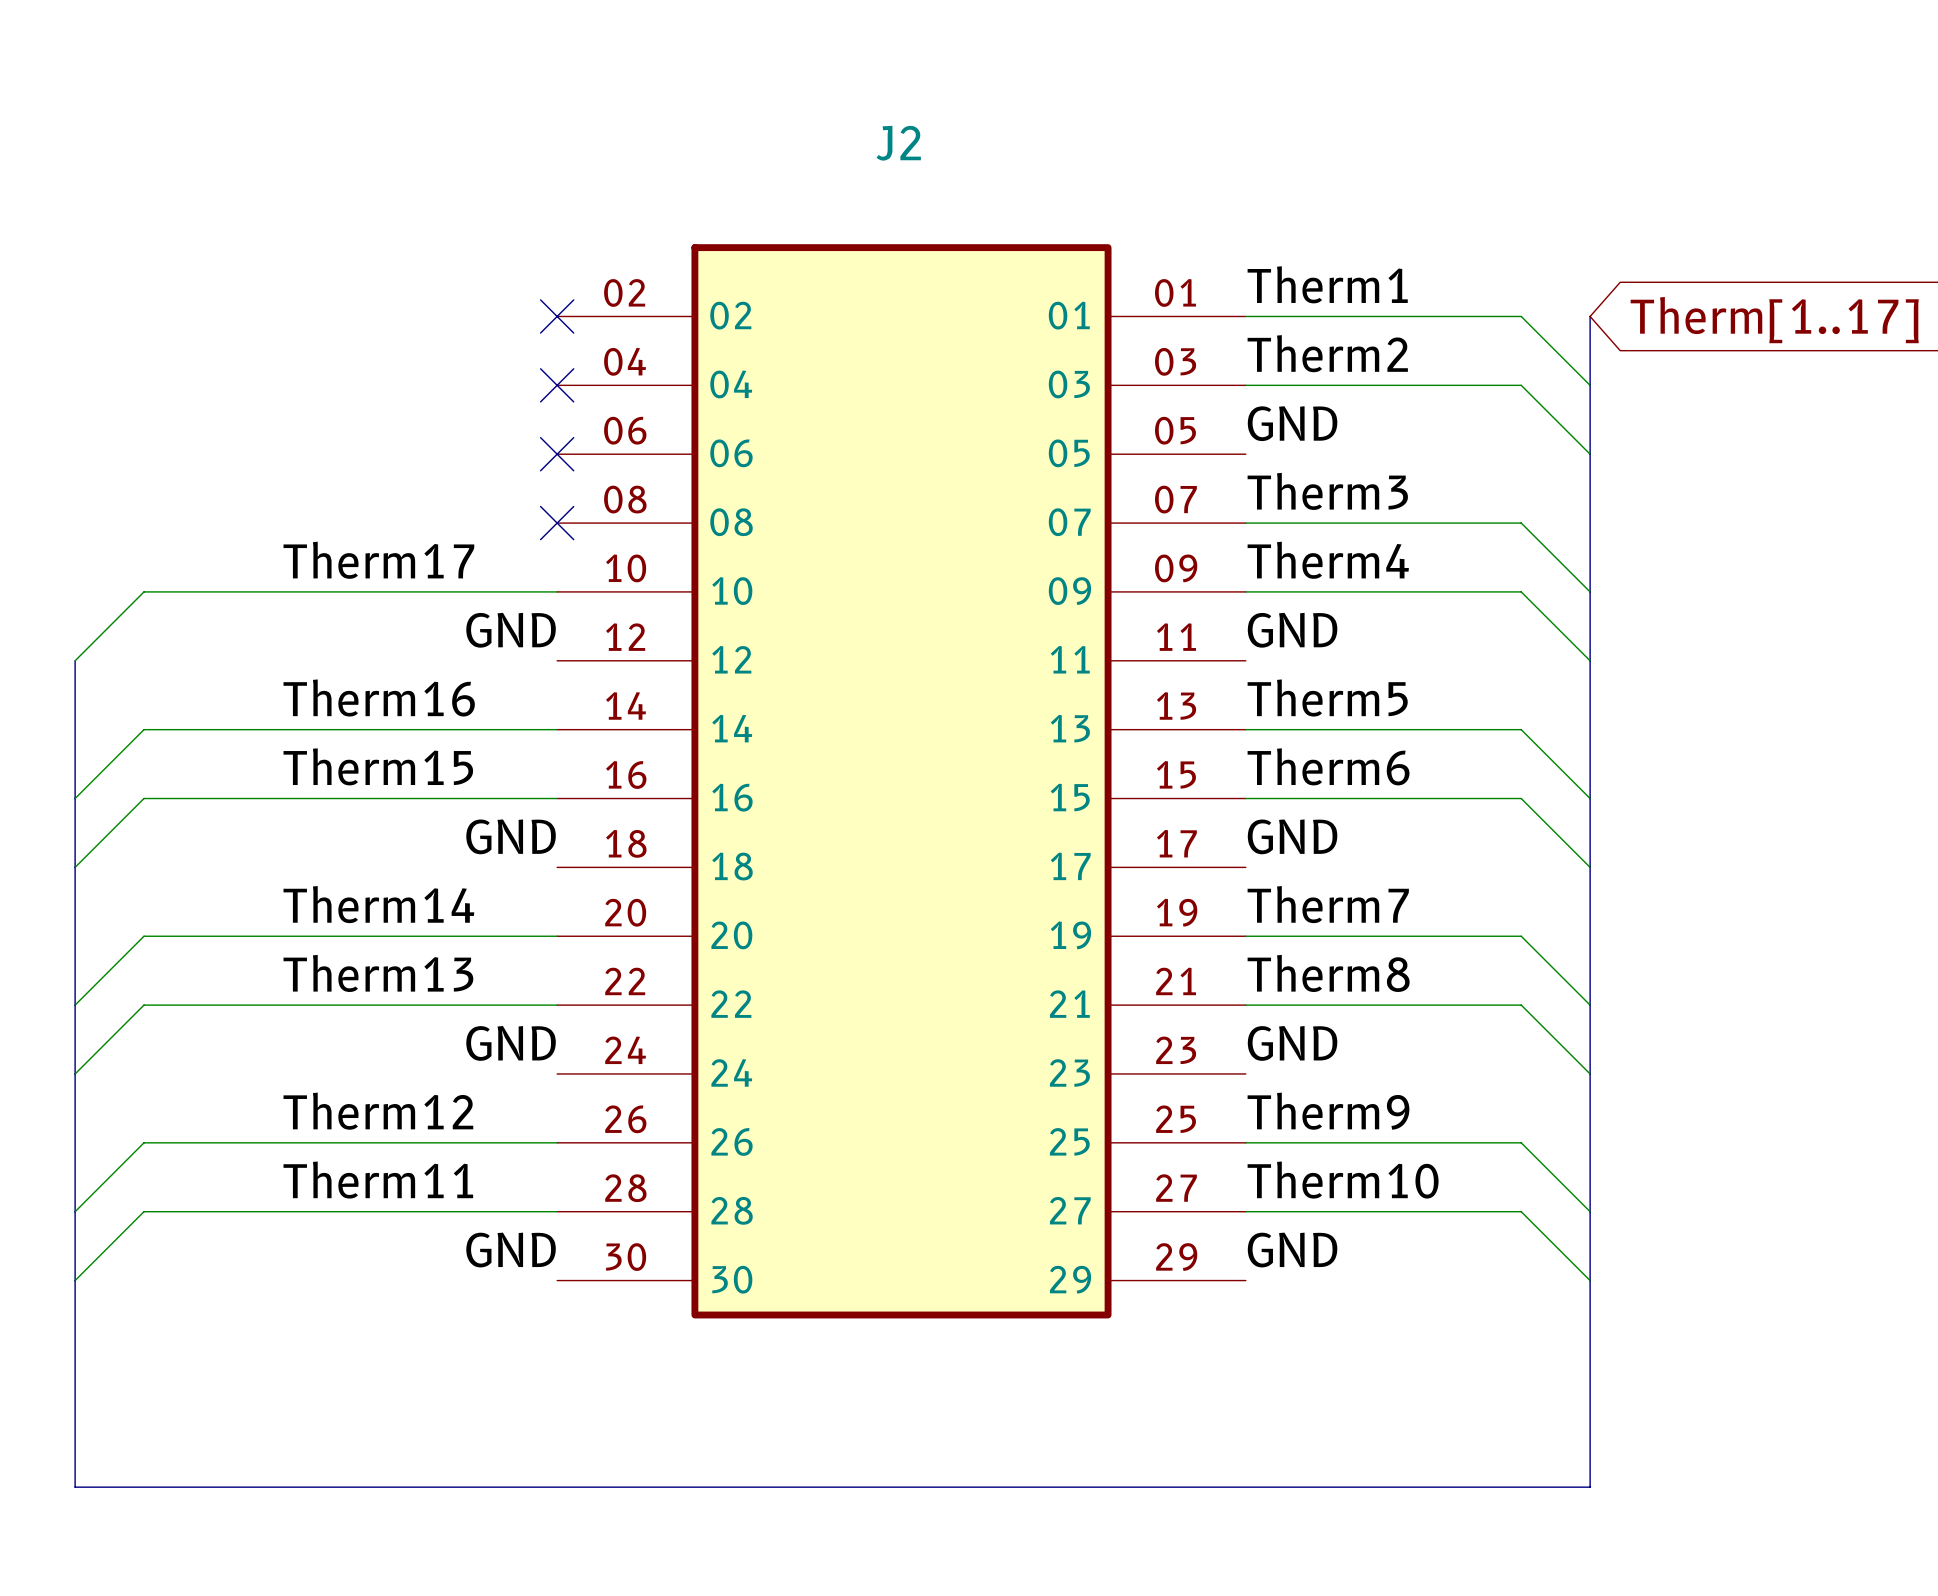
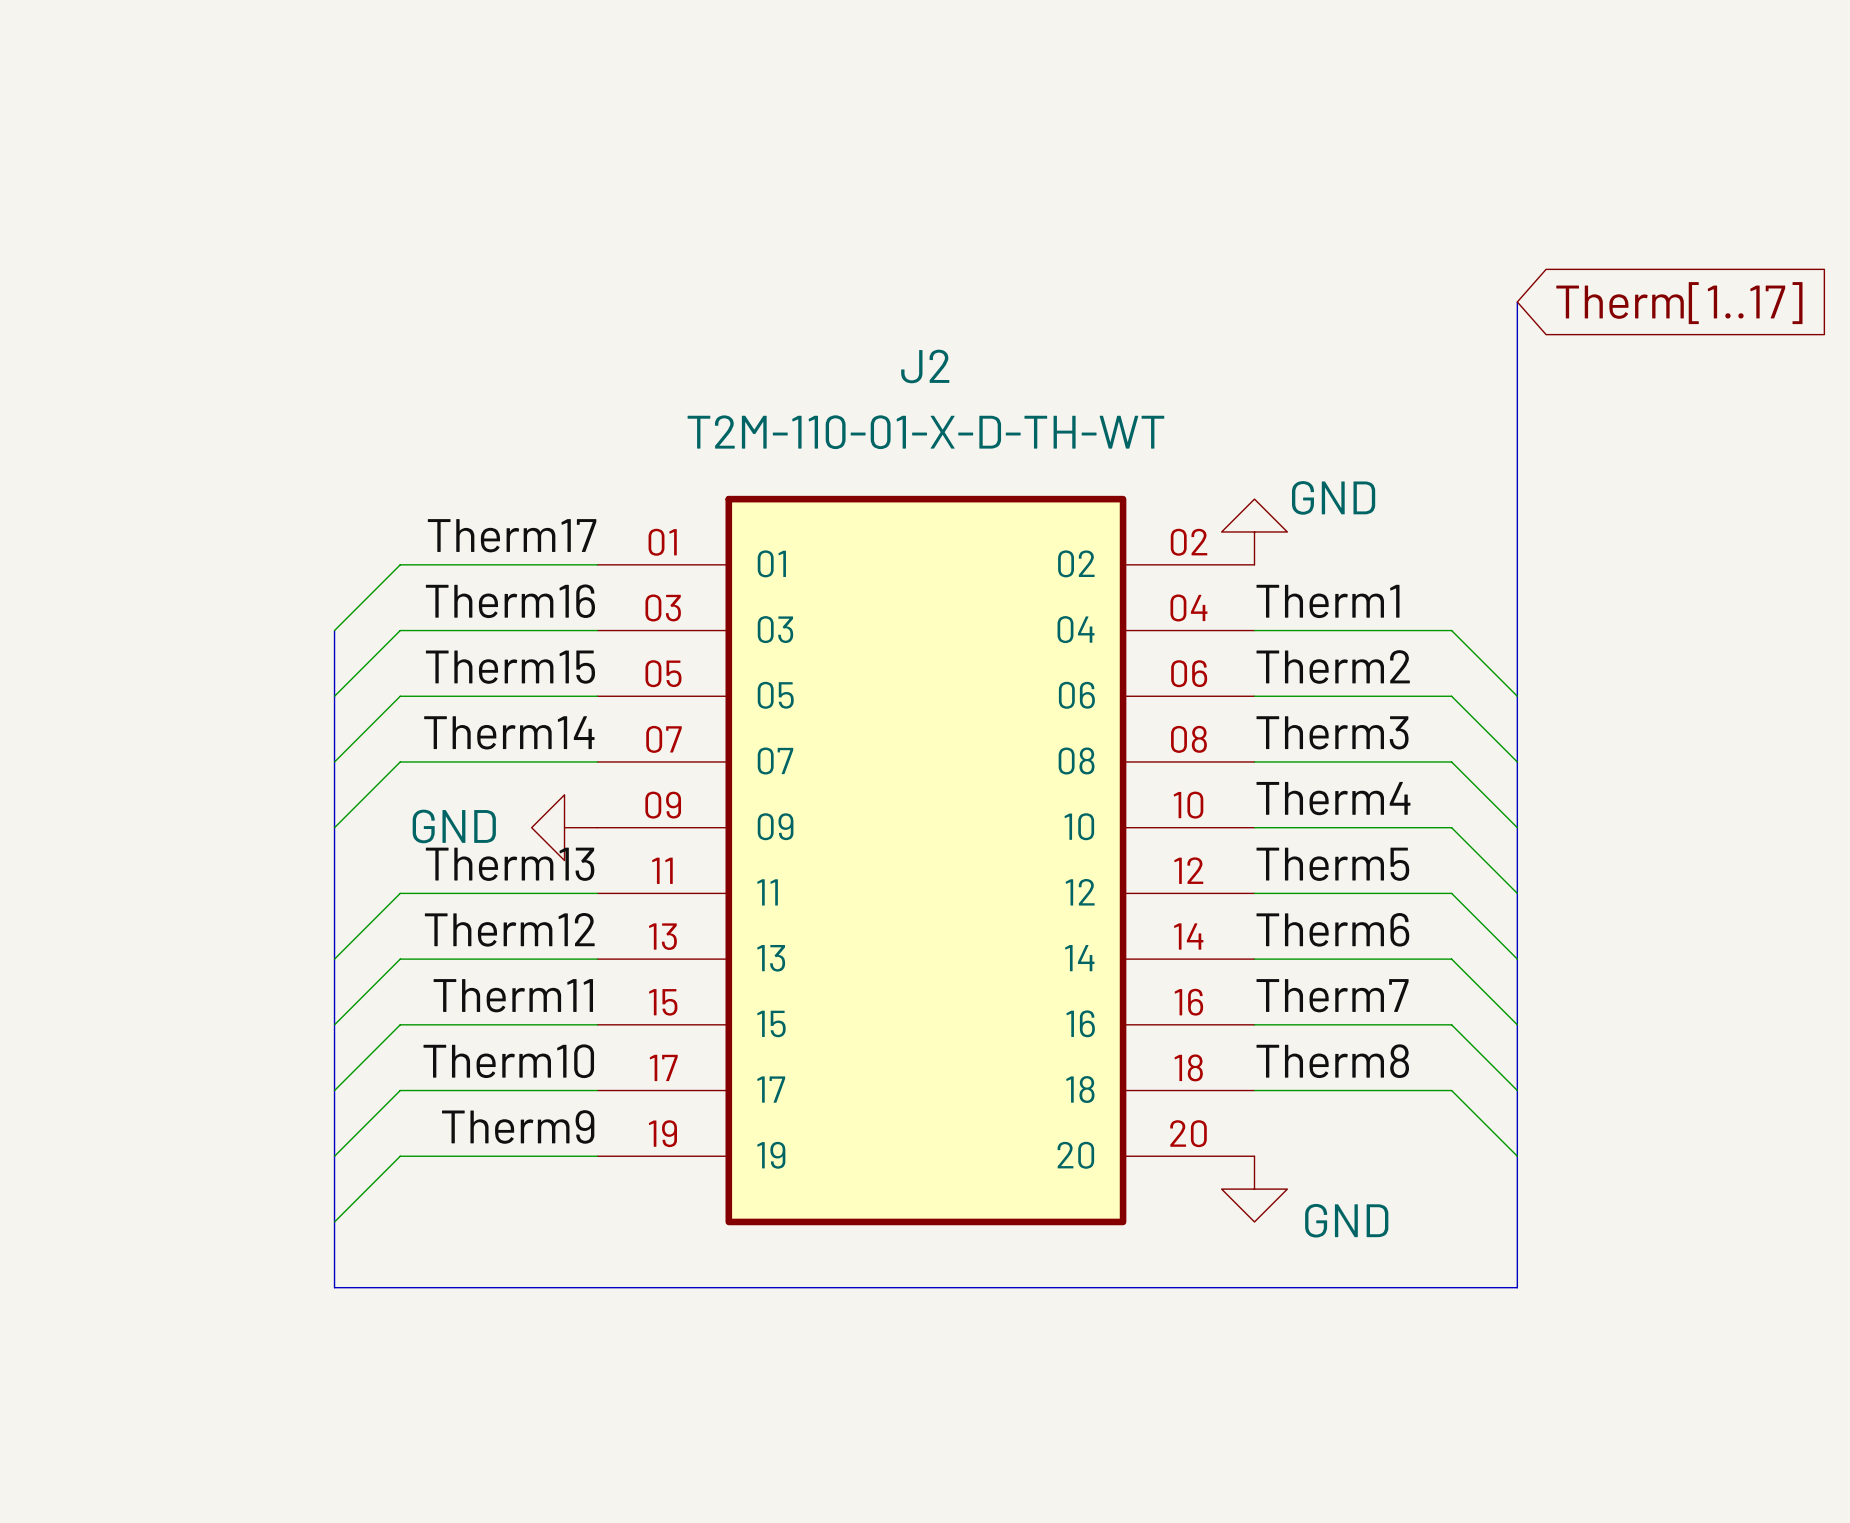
J2 name position: J2 (898, 143) -> J2 (925, 366)
J2 symbol: [557, 244, 1246, 1319] -> [597, 495, 1255, 1226]
label position: Therm1 (1327, 284) -> Therm1 (1327, 601)
no-connect mark: (557, 316) -> none
wire: (1245, 316) (1521, 316) (1590, 385) -> none
label position: Therm2 (1327, 353) -> Therm2 (1333, 666)
no-connect mark: (557, 385) -> none
wire: (1245, 385) (1521, 385) (1590, 454) -> none
label: GND (1292, 423) -> none
J2 value: none -> T2M-110-01-X-D-TH-WT (925, 432)
no-connect mark: (557, 454) -> none
label position: Therm3 (1327, 491) -> Therm3 (1332, 732)
no-connect mark: (557, 523) -> none
wire: (1245, 523) (1521, 523) (1590, 591) -> none
power symbol: none -> GND (1254, 531)
label position: Therm17 (378, 560) -> Therm17 (512, 535)
label position: Therm4 (1328, 560) -> Therm4 (1333, 798)
wire: (419, 591) (143, 591) (75, 660) -> (400, 564) (334, 630)
wire: (1245, 591) (1521, 591) (1590, 660) -> none
label: GND (511, 630) -> none
label: GND (1292, 630) -> none
bus: (75, 660) (75, 1487) (1590, 1487) (1590, 1349) -> (334, 630) (334, 1287) (1517, 1287)
wire: none -> (597, 630) (400, 630) (334, 696)
wire: none -> (1254, 630) (1451, 630) (1517, 696)
label position: Therm16 (379, 697) -> Therm16 (510, 601)
label position: Therm5 (1327, 697) -> Therm5 (1332, 864)
wire: (419, 729) (143, 729) (75, 798) -> (400, 696) (334, 761)
label position: Therm15 (378, 766) -> Therm15 (510, 667)
label position: Therm6 (1328, 766) -> Therm6 (1332, 929)
wire: (419, 798) (143, 798) (75, 867) -> (400, 761) (334, 827)
label: GND (511, 836) -> none
label: GND (1292, 836) -> none
power symbol: none -> GND (564, 827)
wire: none -> (1254, 827) (1451, 827) (1517, 893)
label position: Therm14 (378, 904) -> Therm14 (509, 732)
label position: Therm7 (1328, 904) -> Therm7 (1332, 995)
wire: (419, 936) (143, 936) (75, 1005) -> (400, 893) (334, 959)
label position: Therm13 (378, 973) -> Therm13 (510, 864)
label position: Therm8 (1328, 973) -> Therm8 (1332, 1061)
wire: (419, 1005) (143, 1005) (75, 1073) -> (400, 959) (334, 1024)
label: GND (511, 1043) -> none
label: GND (1292, 1043) -> none
wire: none -> (597, 1024) (400, 1024) (334, 1090)
wire: none -> (1254, 1024) (1451, 1024) (1517, 1090)
label position: Therm12 (378, 1111) -> Therm12 (509, 929)
label position: Therm9 (1328, 1111) -> Therm9 (518, 1126)
wire: (419, 1142) (143, 1142) (75, 1211) -> (400, 1090) (334, 1156)
label position: Therm11 (378, 1180) -> Therm11 (513, 995)
label position: Therm10 (1343, 1180) -> Therm10 (508, 1061)
wire: (419, 1211) (143, 1211) (75, 1280) -> (400, 1156) (334, 1221)
wire: (1245, 1211) (1521, 1211) (1590, 1280) -> none
power symbol: none -> GND (1254, 1189)
label: GND (511, 1250) -> none
label: GND (1292, 1250) -> none

